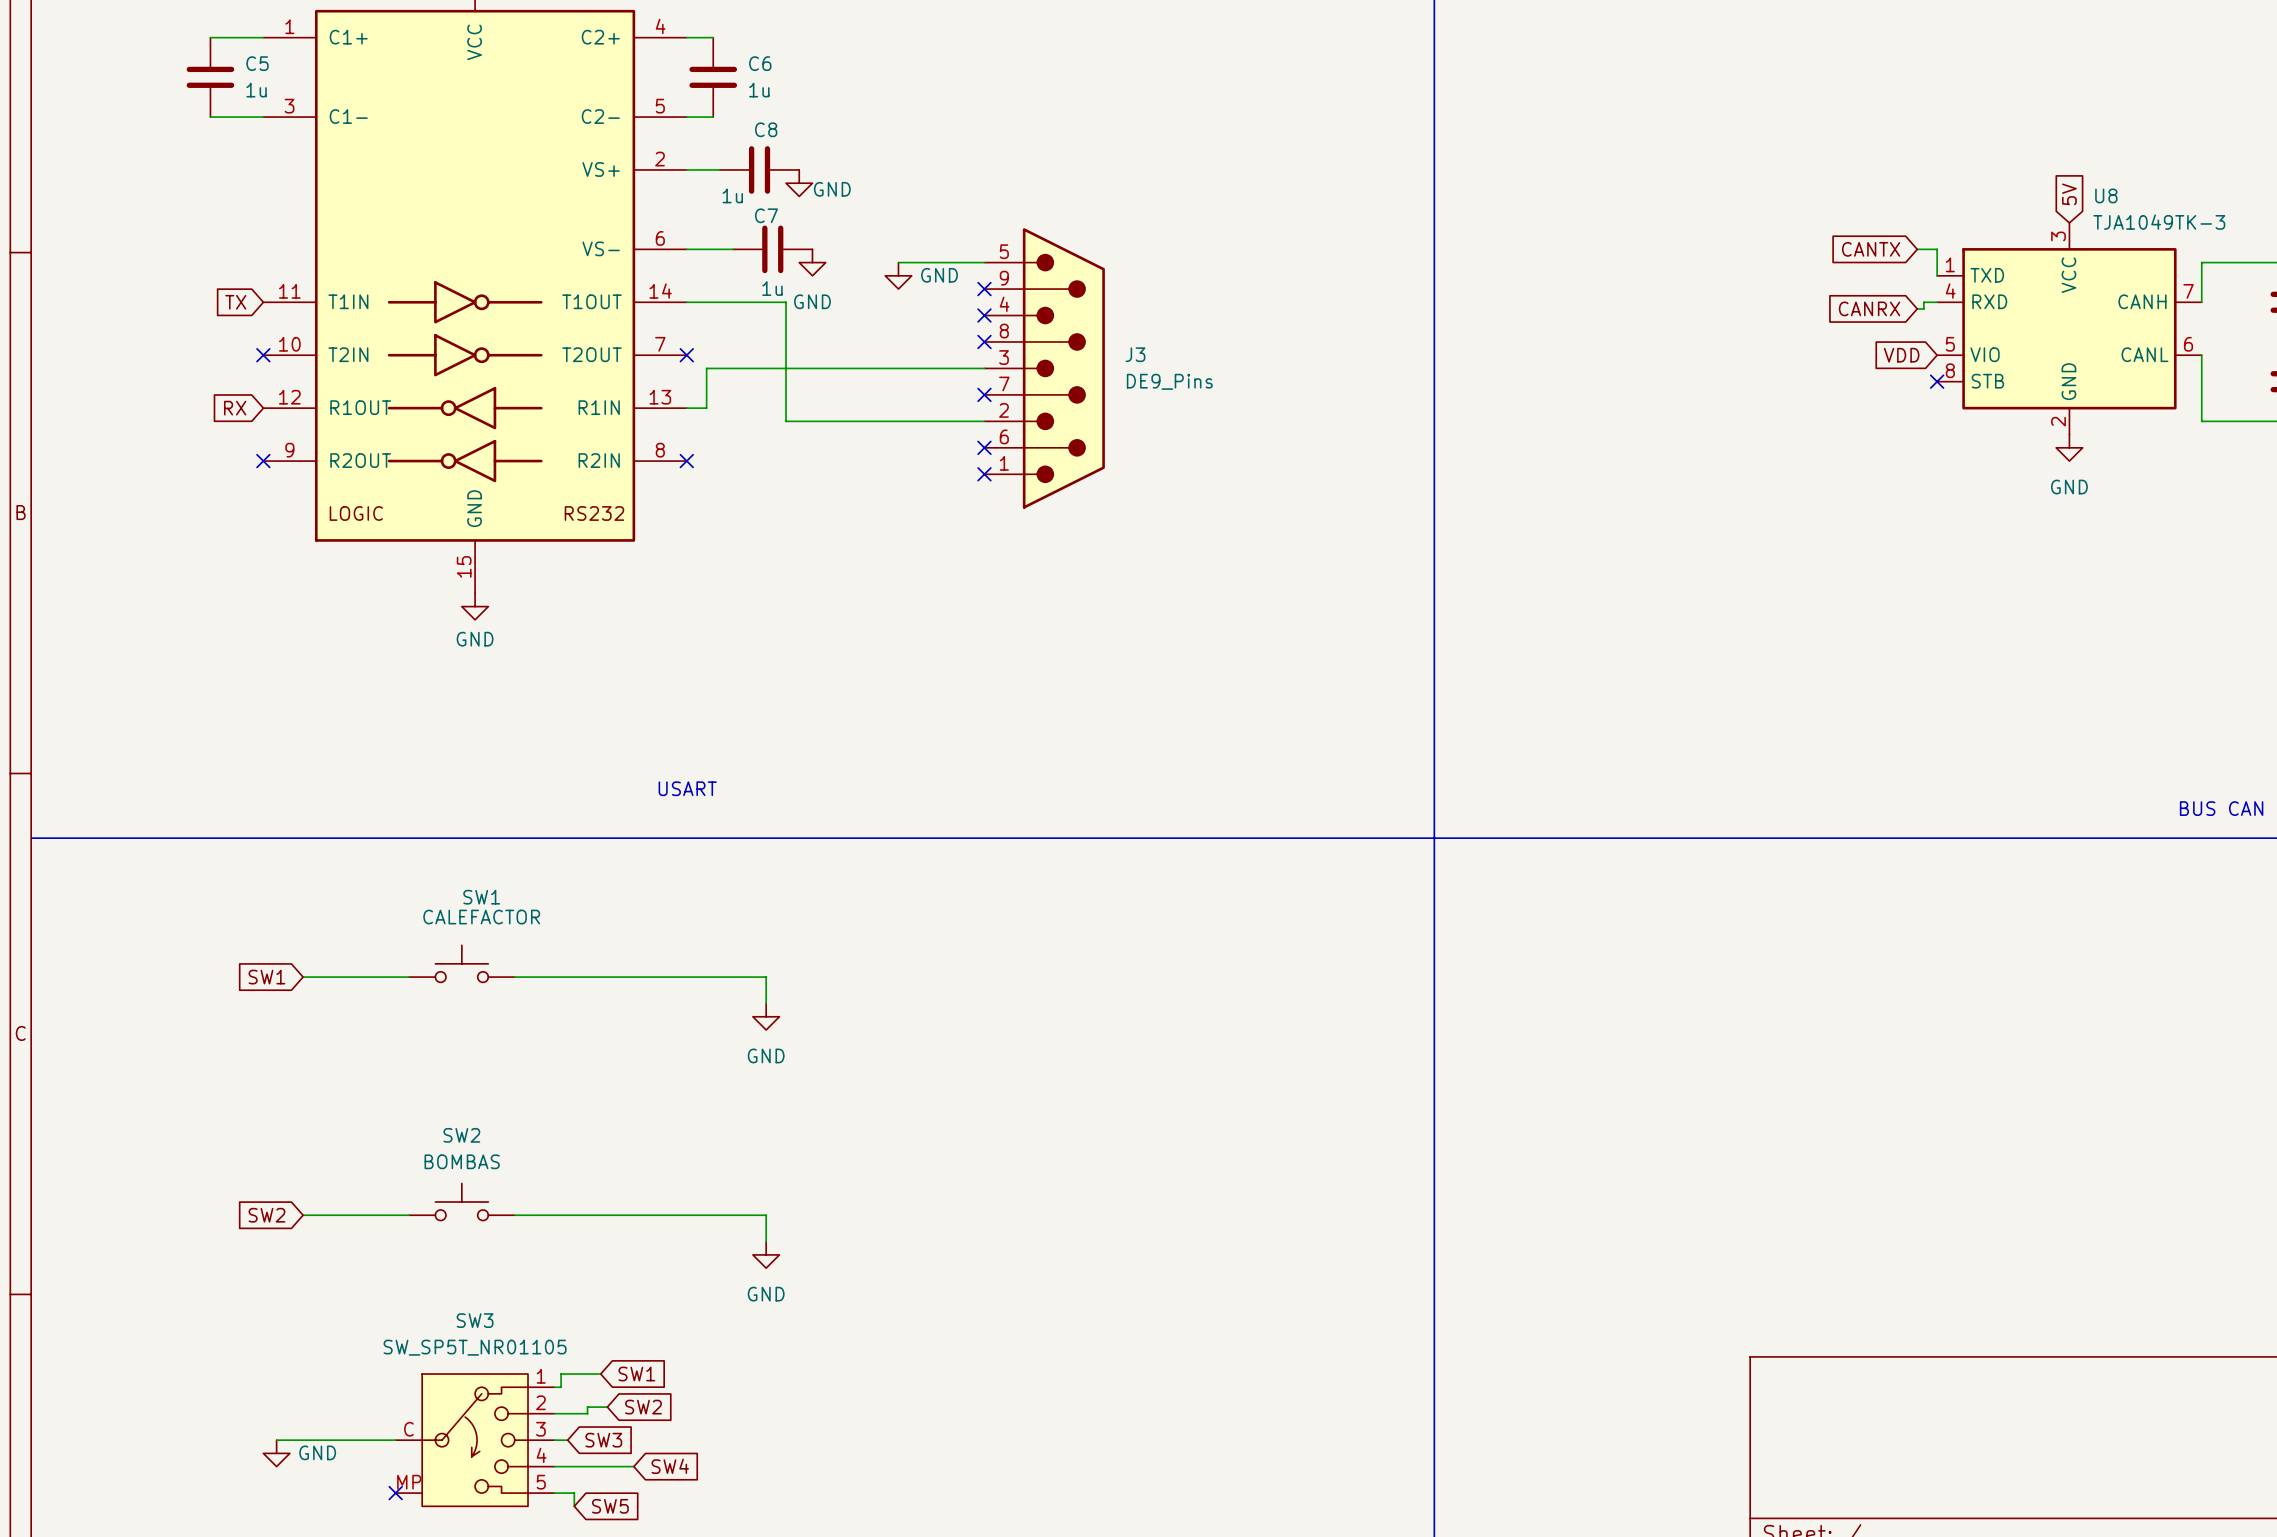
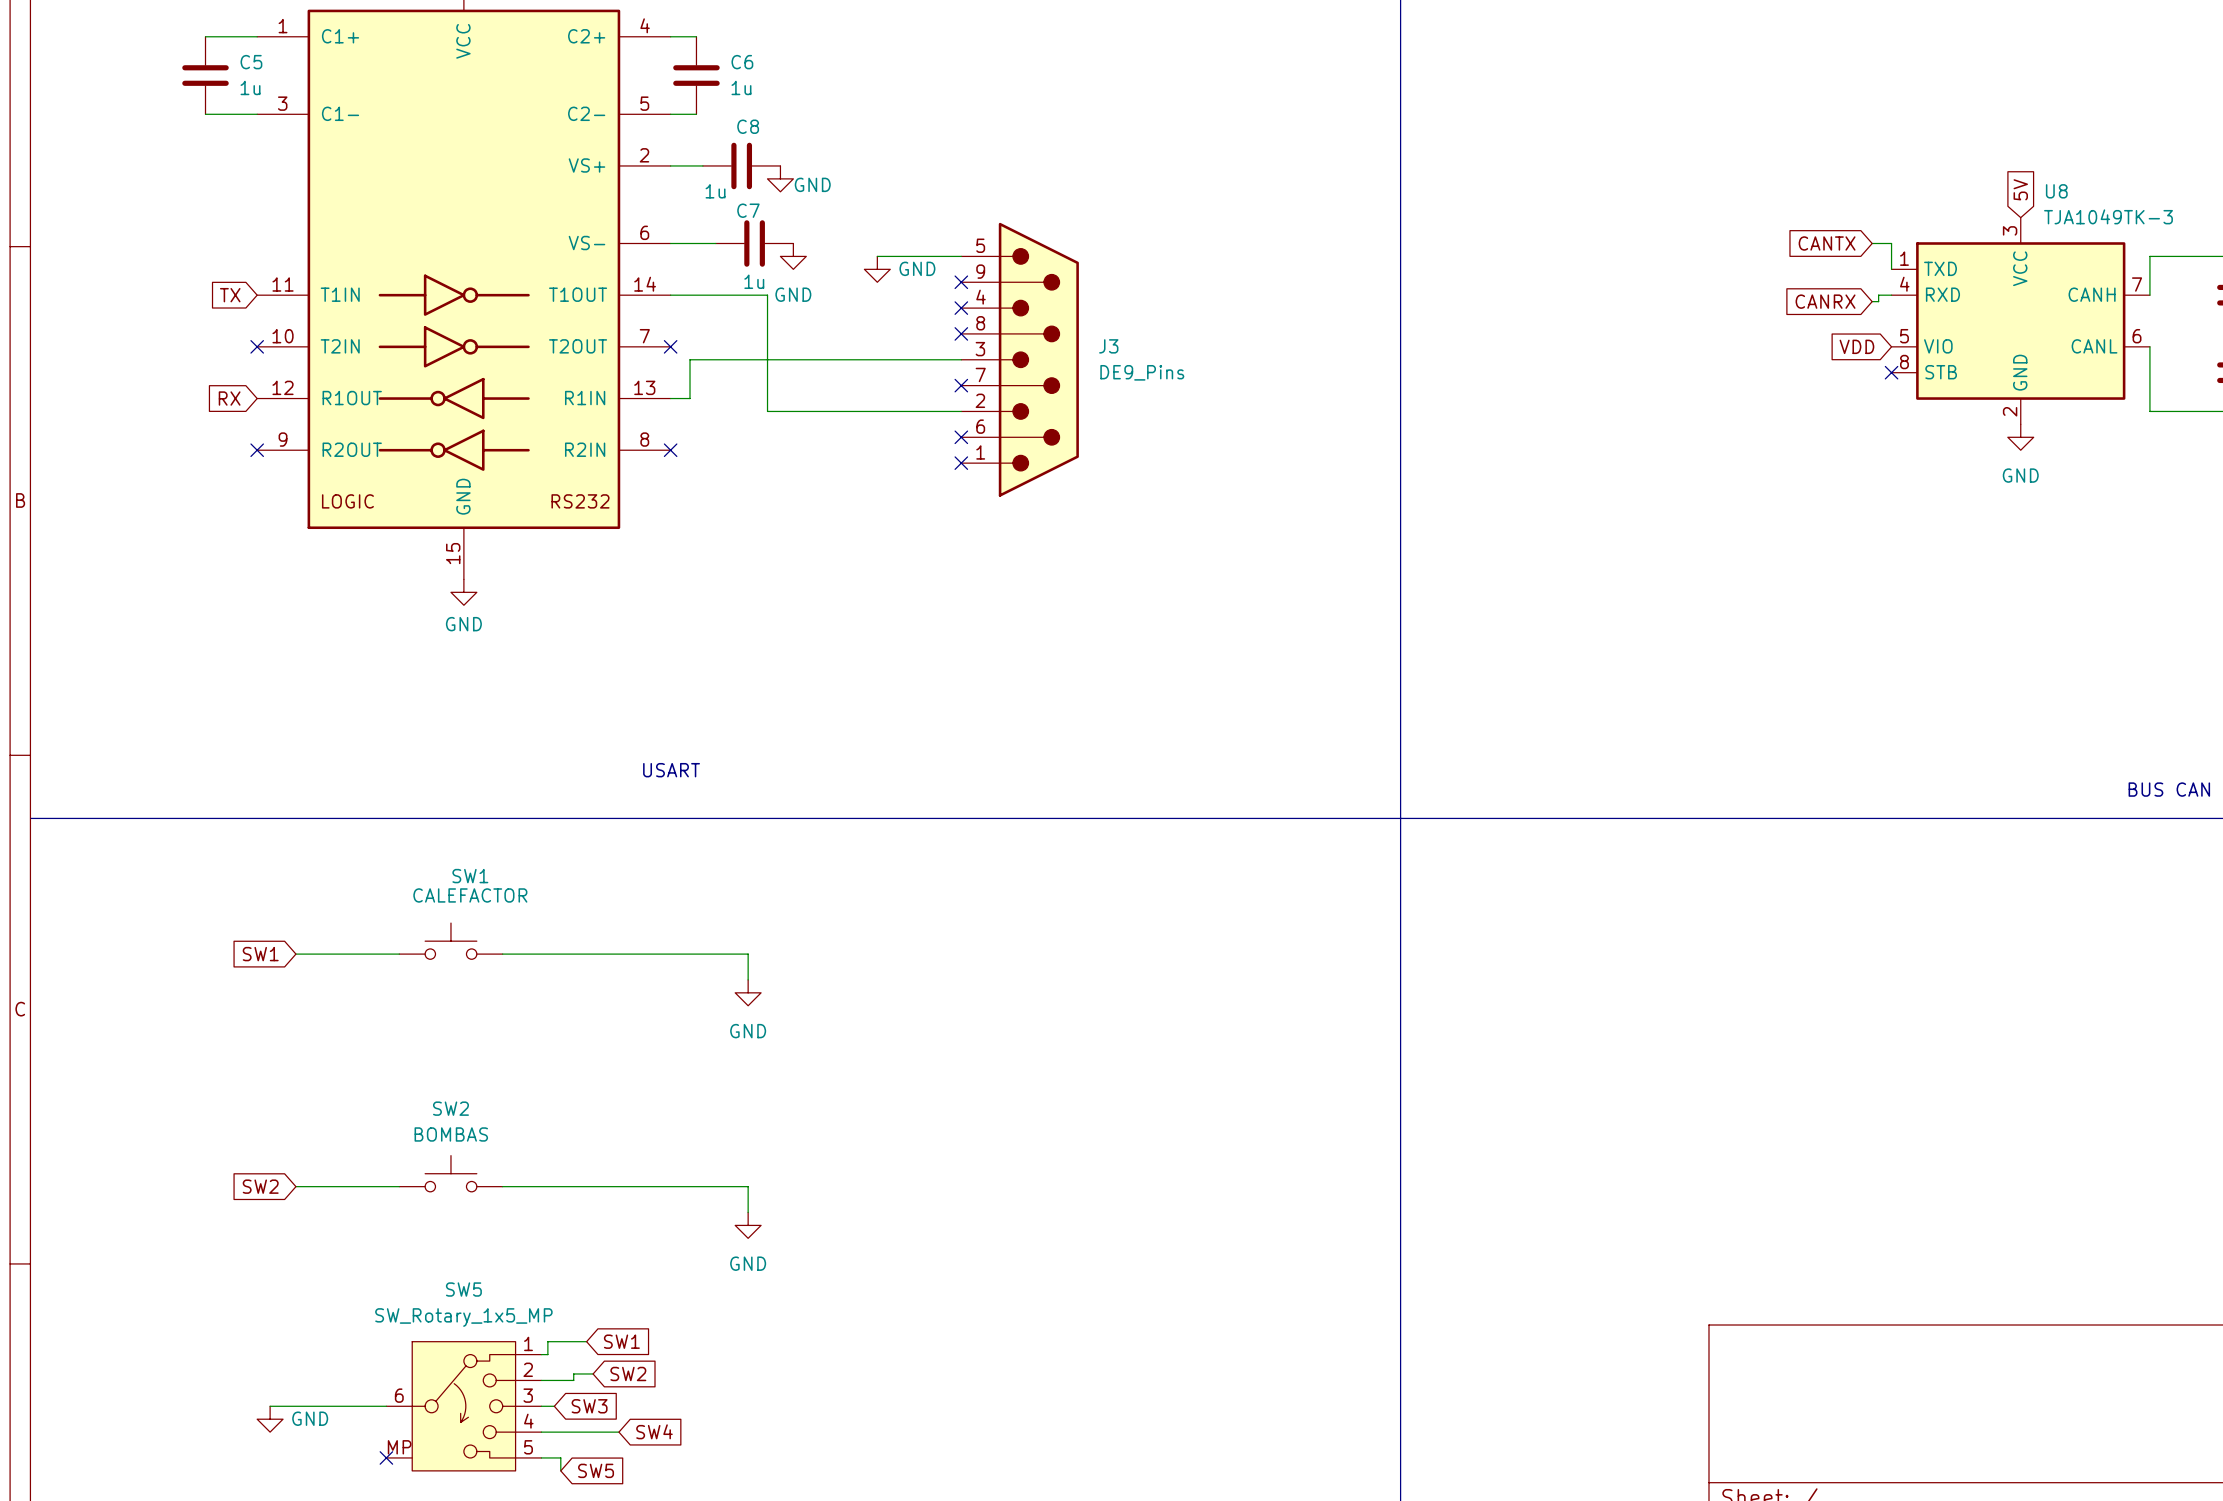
SW3: SW_SP5T_NR01105 (475, 1440) -> none
SW5: none -> SW_Rotary_1x5_MP (463, 1406)

